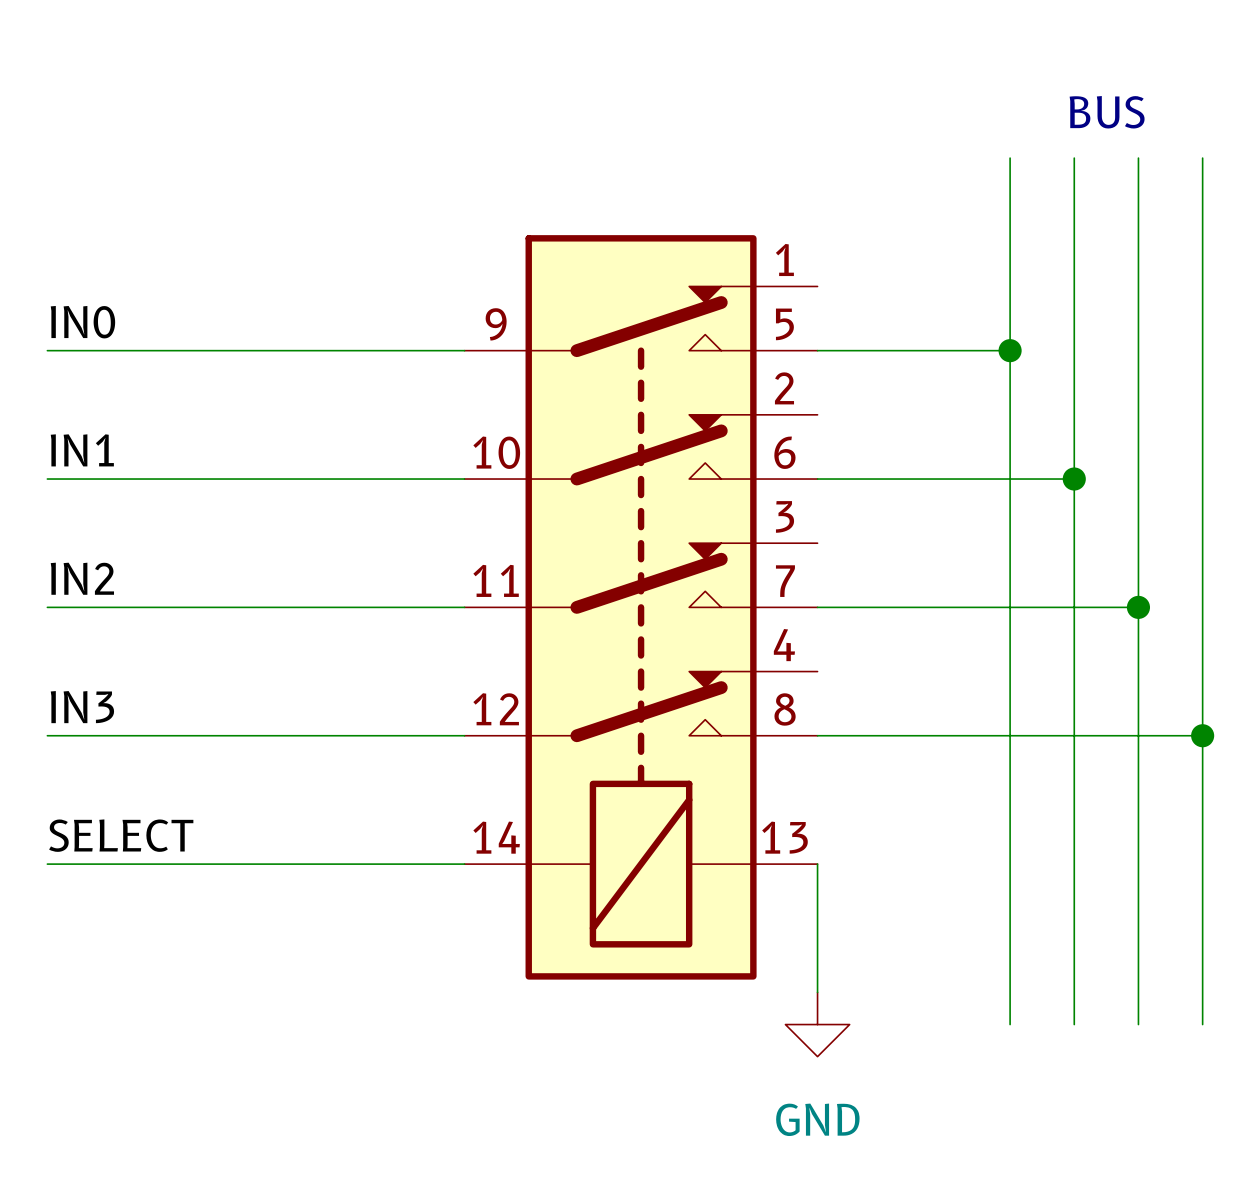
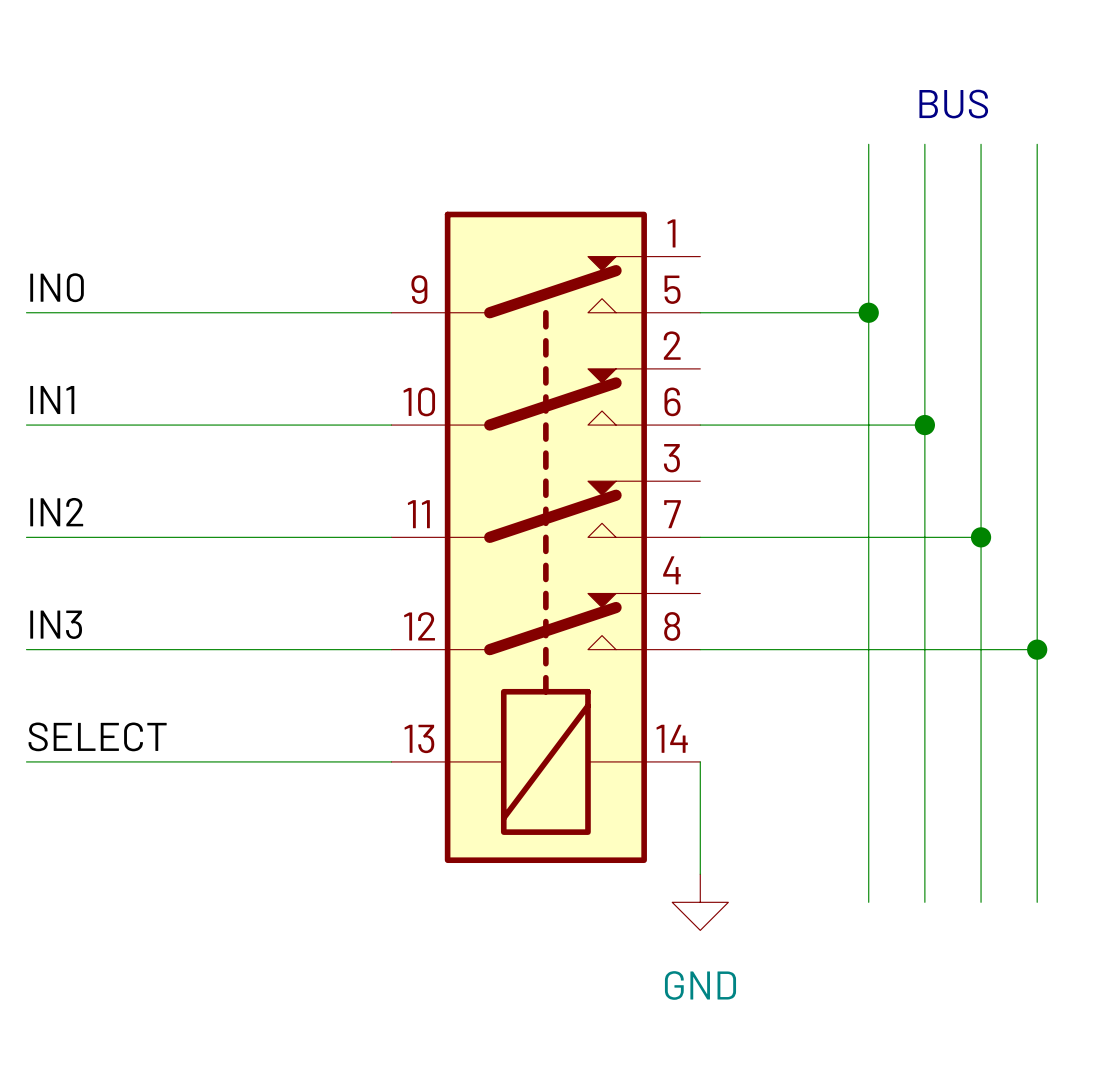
part pin number: 14 (496, 837) -> 13 (419, 738)
part pin number: 13 (784, 837) -> 14 (672, 738)

